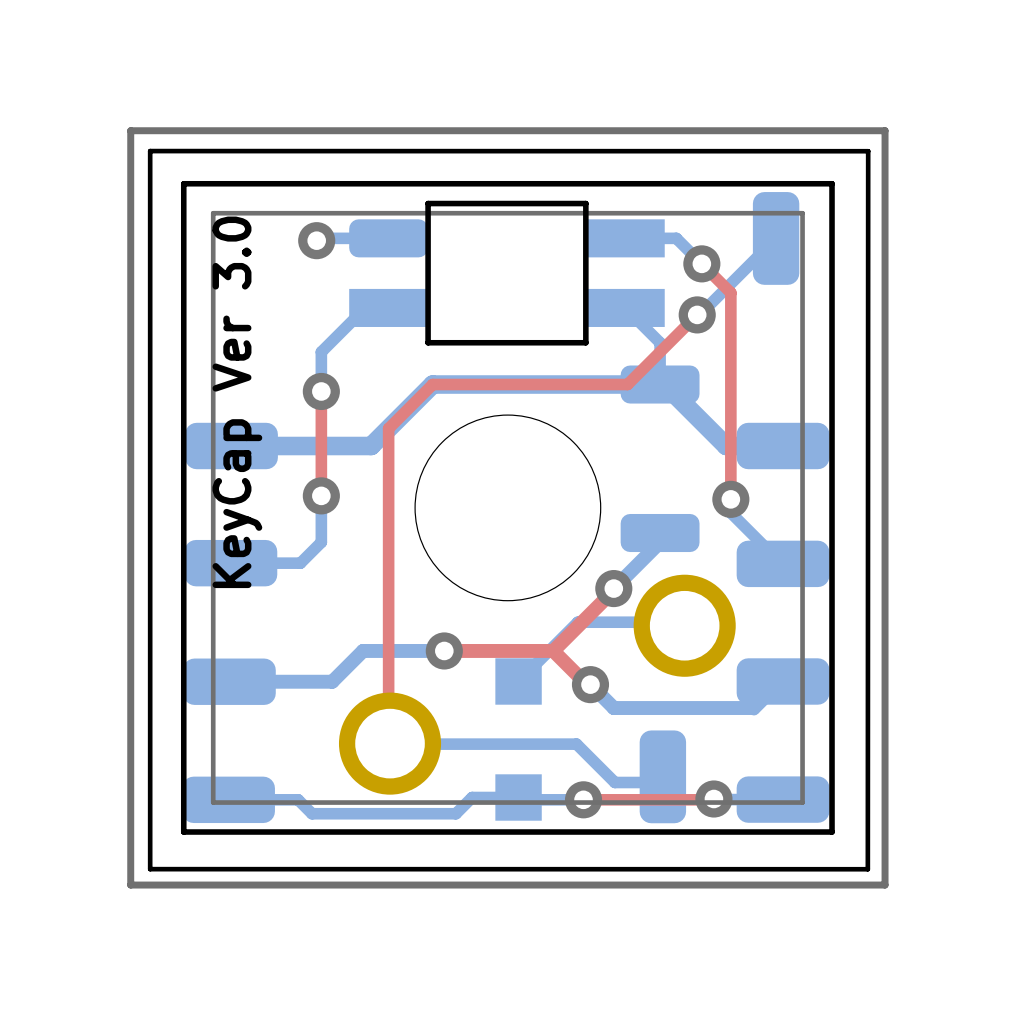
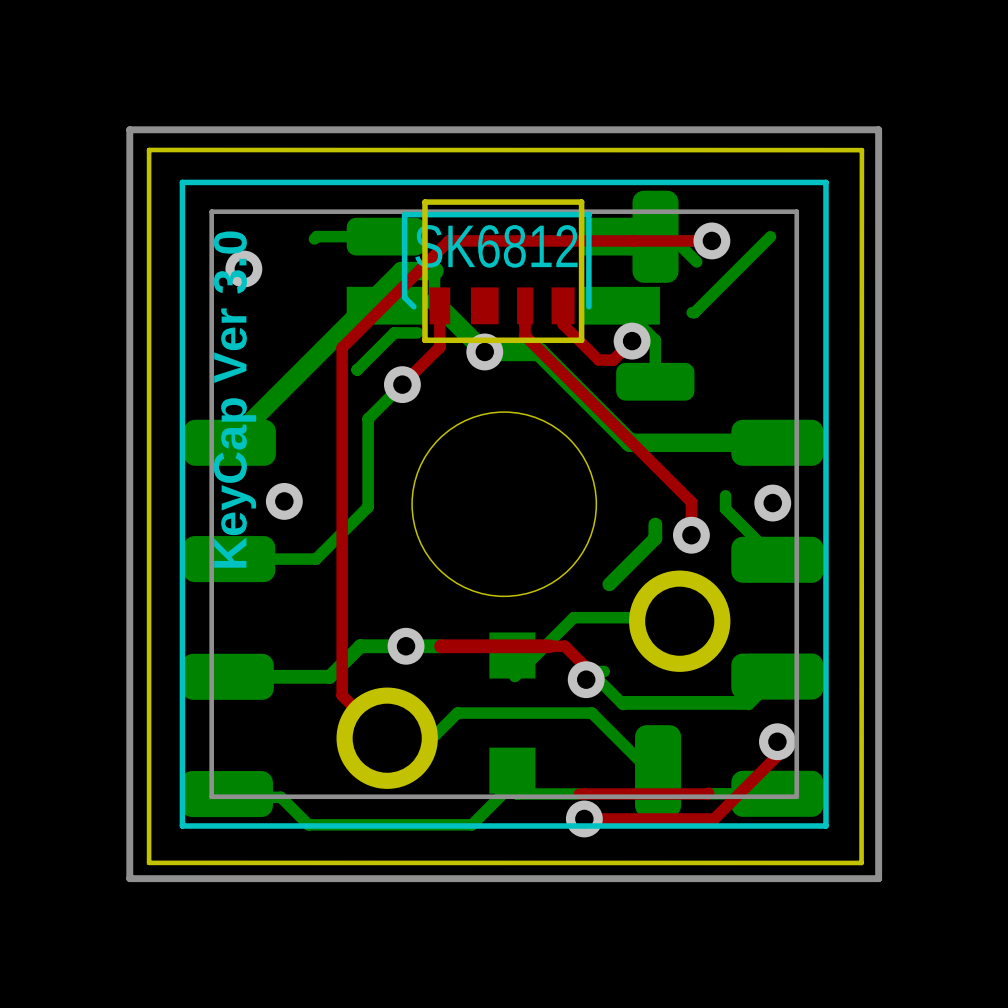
part position: (776, 238) -> (655, 236)
via: (316, 240) -> none
top track: (701, 263) (730, 292) (730, 499) -> none
via position: (701, 263) -> (711, 240)
via: none -> (243, 269)
part: none -> SK6812 (496, 268)
bottom track: (388, 307) (365, 307) (321, 352) (321, 391) -> none
top track: none -> (439, 305) (439, 347) (402, 384)
top track: none -> (525, 305) (525, 335) (691, 502) (691, 535)
top track: none -> (563, 305) (563, 324) (598, 360) (613, 360) (632, 341)
top track: (697, 314) (627, 384) (432, 384) (388, 428) (390, 745) -> (711, 240) (449, 240) (342, 347) (342, 695) (387, 740)
via: (697, 314) -> none
bottom track: none -> (417, 332) (394, 332) (357, 369)
via: none -> (632, 341)
via: none -> (484, 351)
via: none -> (402, 384)
top track: (321, 391) (321, 495) -> none
via: (321, 391) -> none
bottom track: (231, 446) (371, 446) (432, 384) (664, 384) (726, 446) -> (229, 442) (401, 271) (434, 271) (434, 301) (484, 351) (539, 351) (630, 442) (720, 442)
bottom track: (321, 495) (321, 542) (300, 563) -> (402, 384) (368, 418) (368, 507) (316, 559) (298, 559)
via position: (321, 495) -> (284, 501)
via: (730, 499) -> none
via: none -> (772, 503)
part: (660, 533) -> none
via: none -> (691, 535)
top track: (613, 588) (553, 650) (587, 684) (590, 684) -> none
via: (613, 588) -> none
via position: (444, 650) -> (406, 646)
top track: none -> (549, 646) (564, 646) (590, 671)
bottom track: (590, 684) (613, 708) (627, 708) -> (604, 671) (590, 671) (623, 704)
part position: (518, 739) -> (512, 713)
bottom track: (390, 744) (576, 744) (614, 782) (660, 782) -> (381, 734) (435, 734) (457, 713) (591, 713) (655, 776)
top track: none -> (777, 741) (777, 755) (714, 818) (580, 818)
via: none -> (777, 741)
bottom track: none -> (512, 784) (472, 824) (308, 824) (280, 797) (229, 797)
bottom track: (508, 797) (472, 797) (455, 813) (312, 813) (298, 799) (234, 799) -> none
via: (713, 798) -> none
via position: (583, 799) -> (584, 818)

